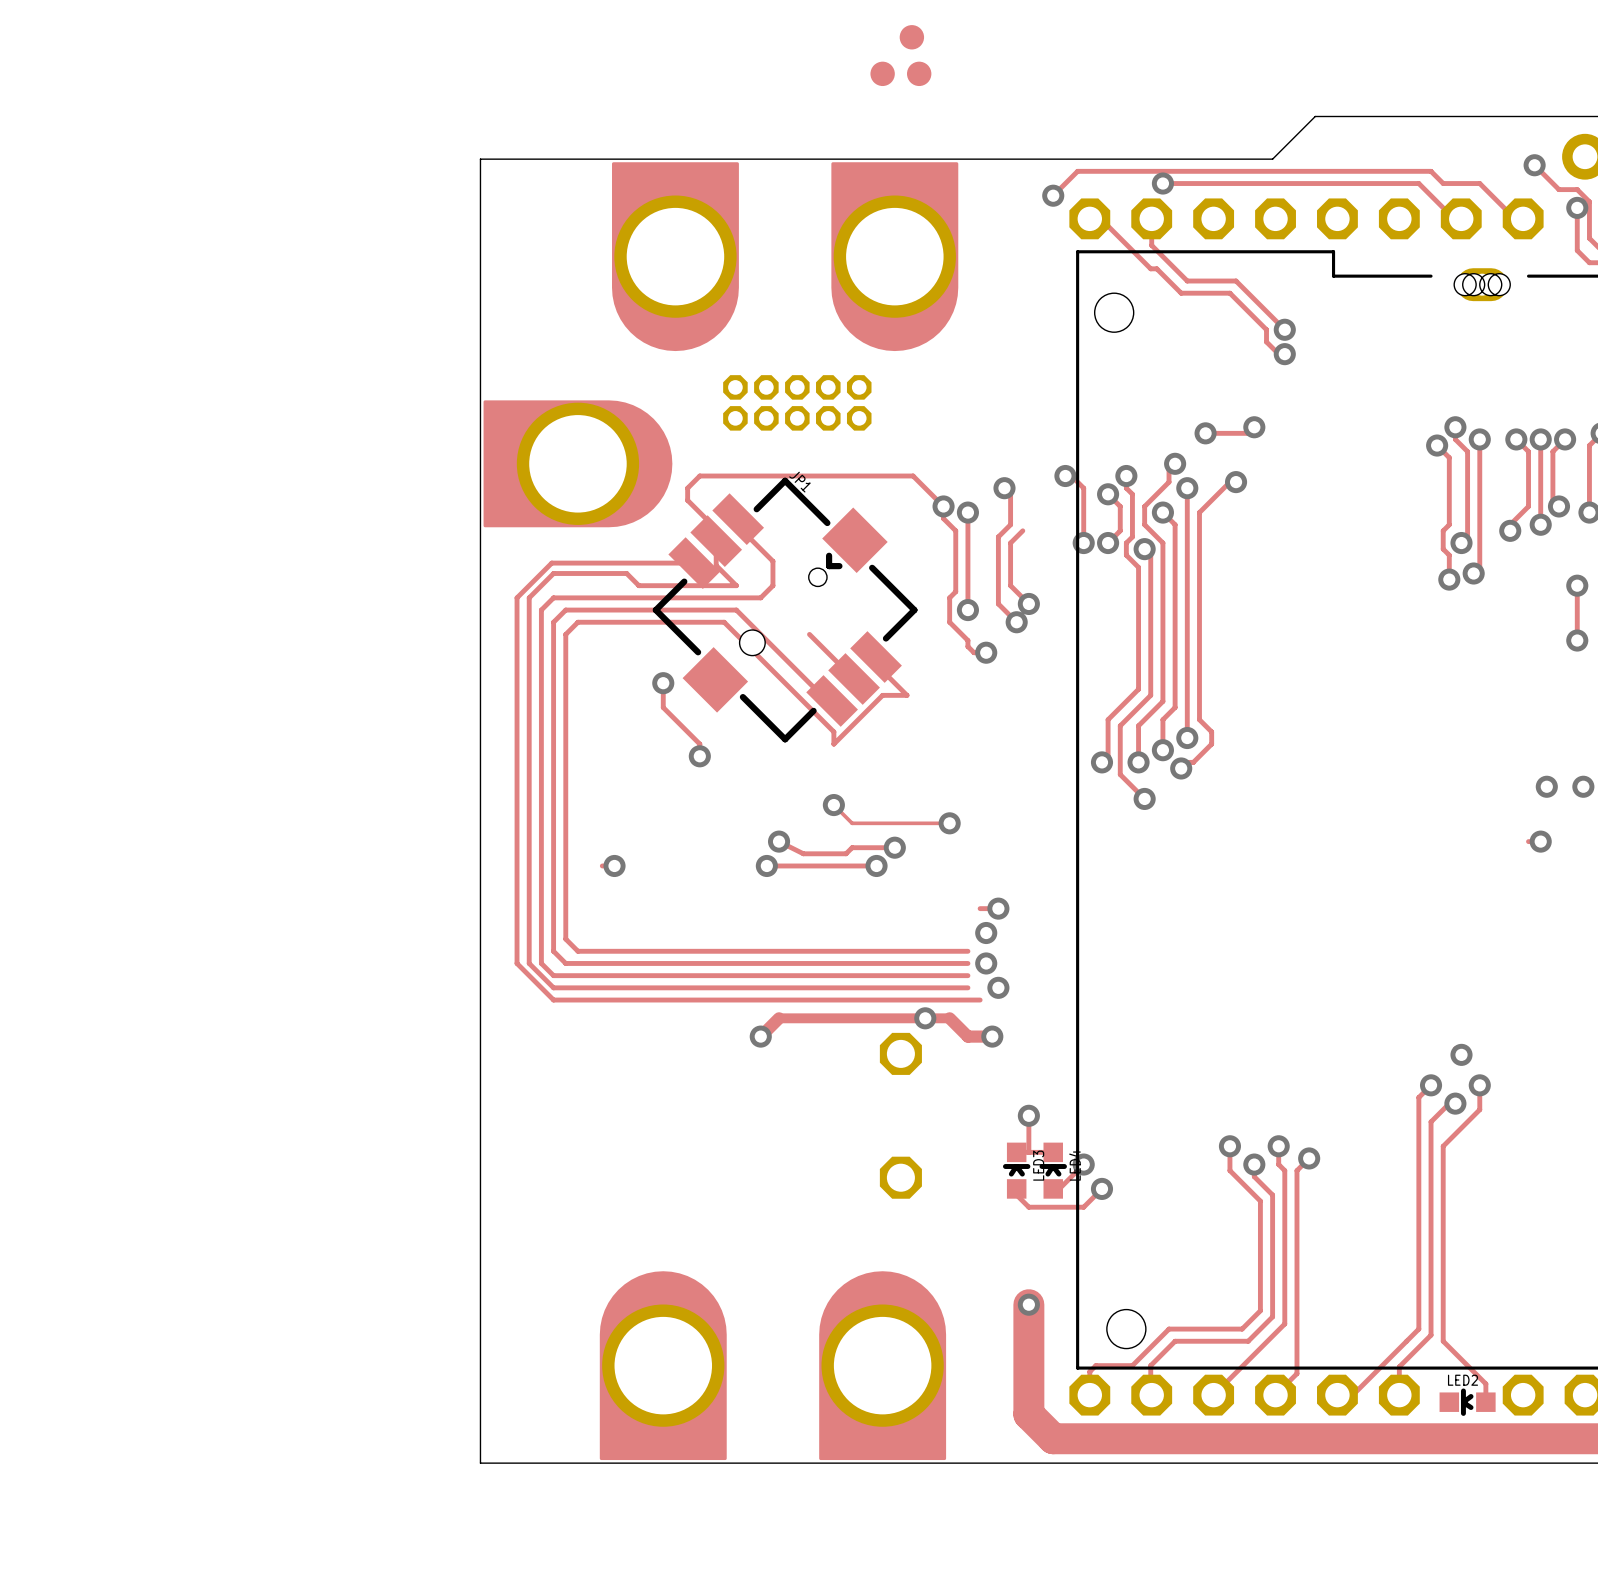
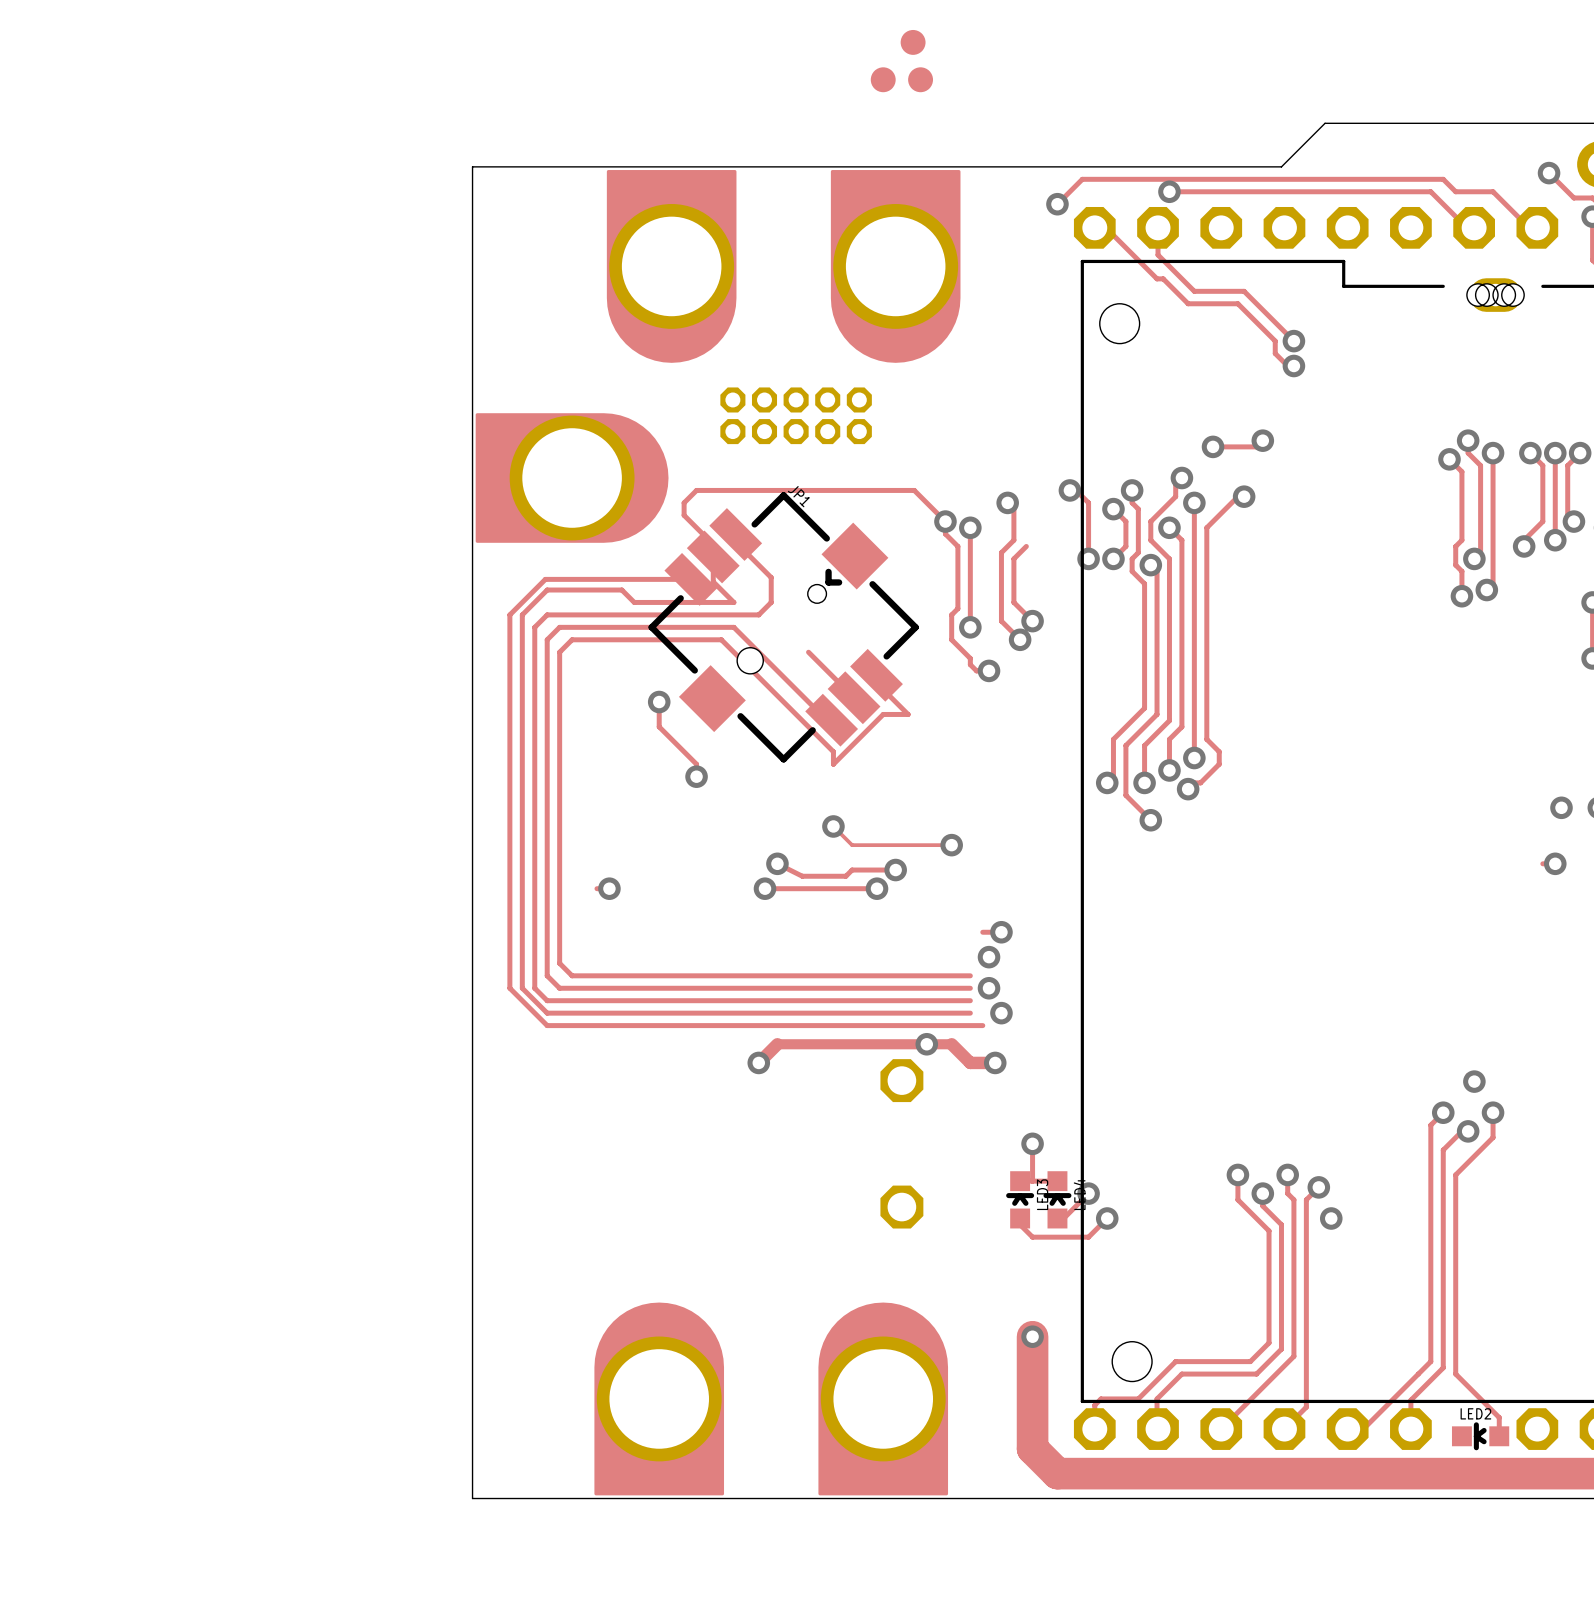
via: none -> (1331, 1218)

